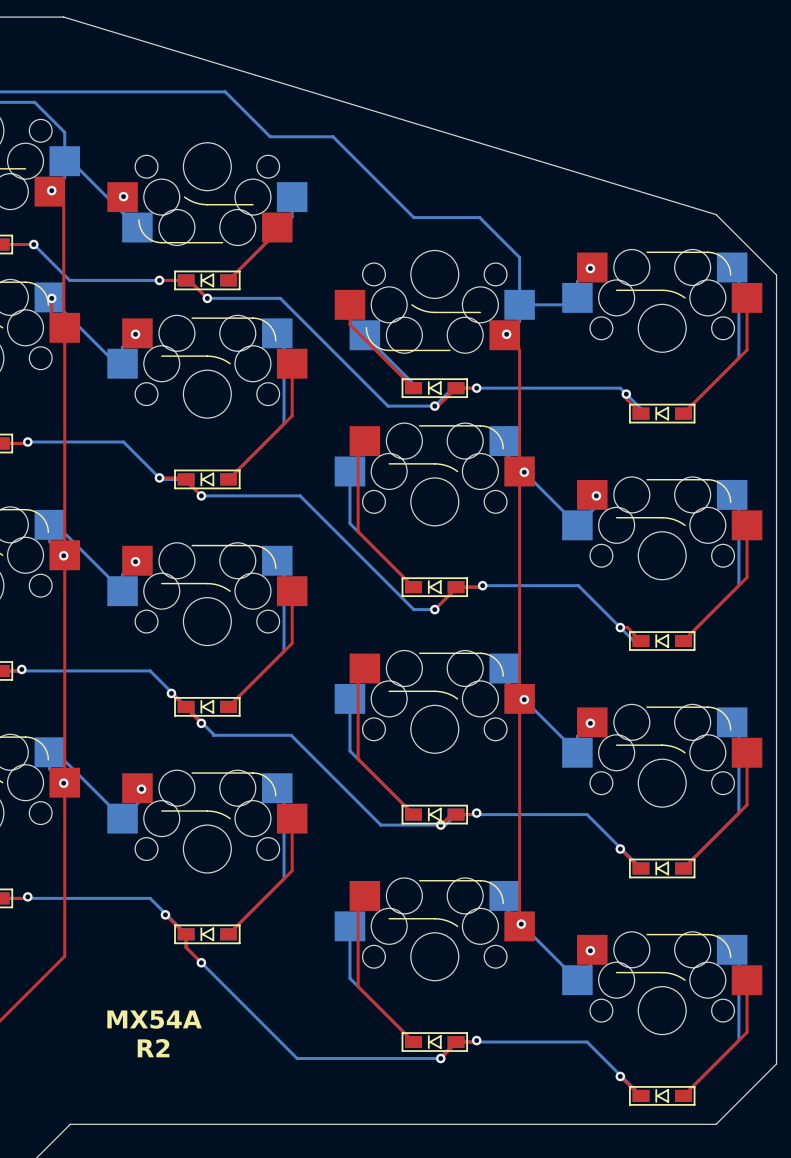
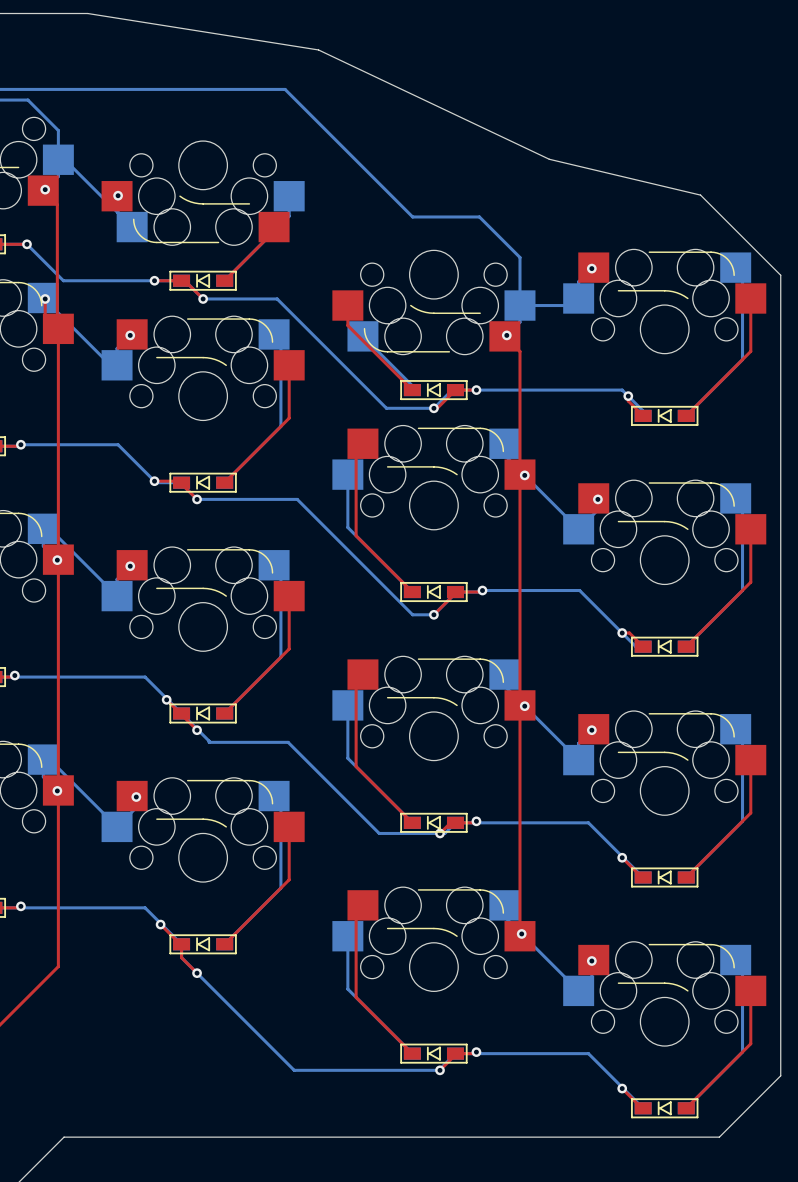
board edge: (63, 17) (716, 214) -> (57, 13) (87, 13) (318, 49) (549, 159) (700, 195) (719, 213)
bottom track: (225, 91) (270, 136) (333, 136) -> (221, 89) (285, 89) (330, 134)
text: MX54A (154, 1019) -> none
text: R2 (153, 1048) -> none

